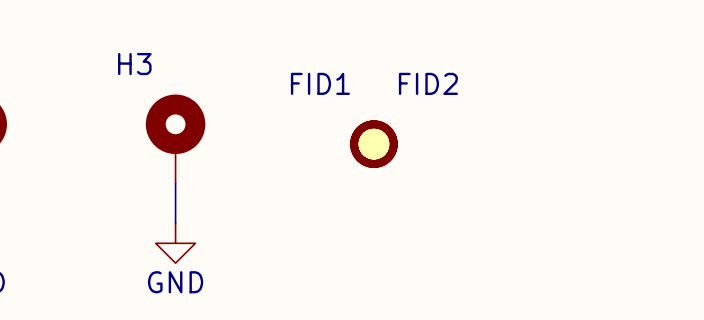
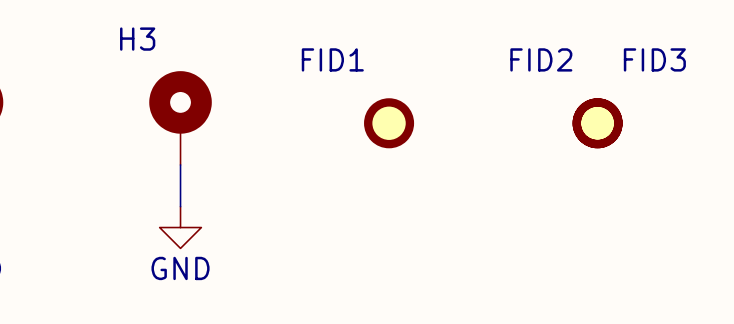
FID2 name position: FID2 (428, 83) -> FID2 (541, 59)
FID2 position: (373, 144) -> (597, 123)
FID3: none -> (597, 123)

